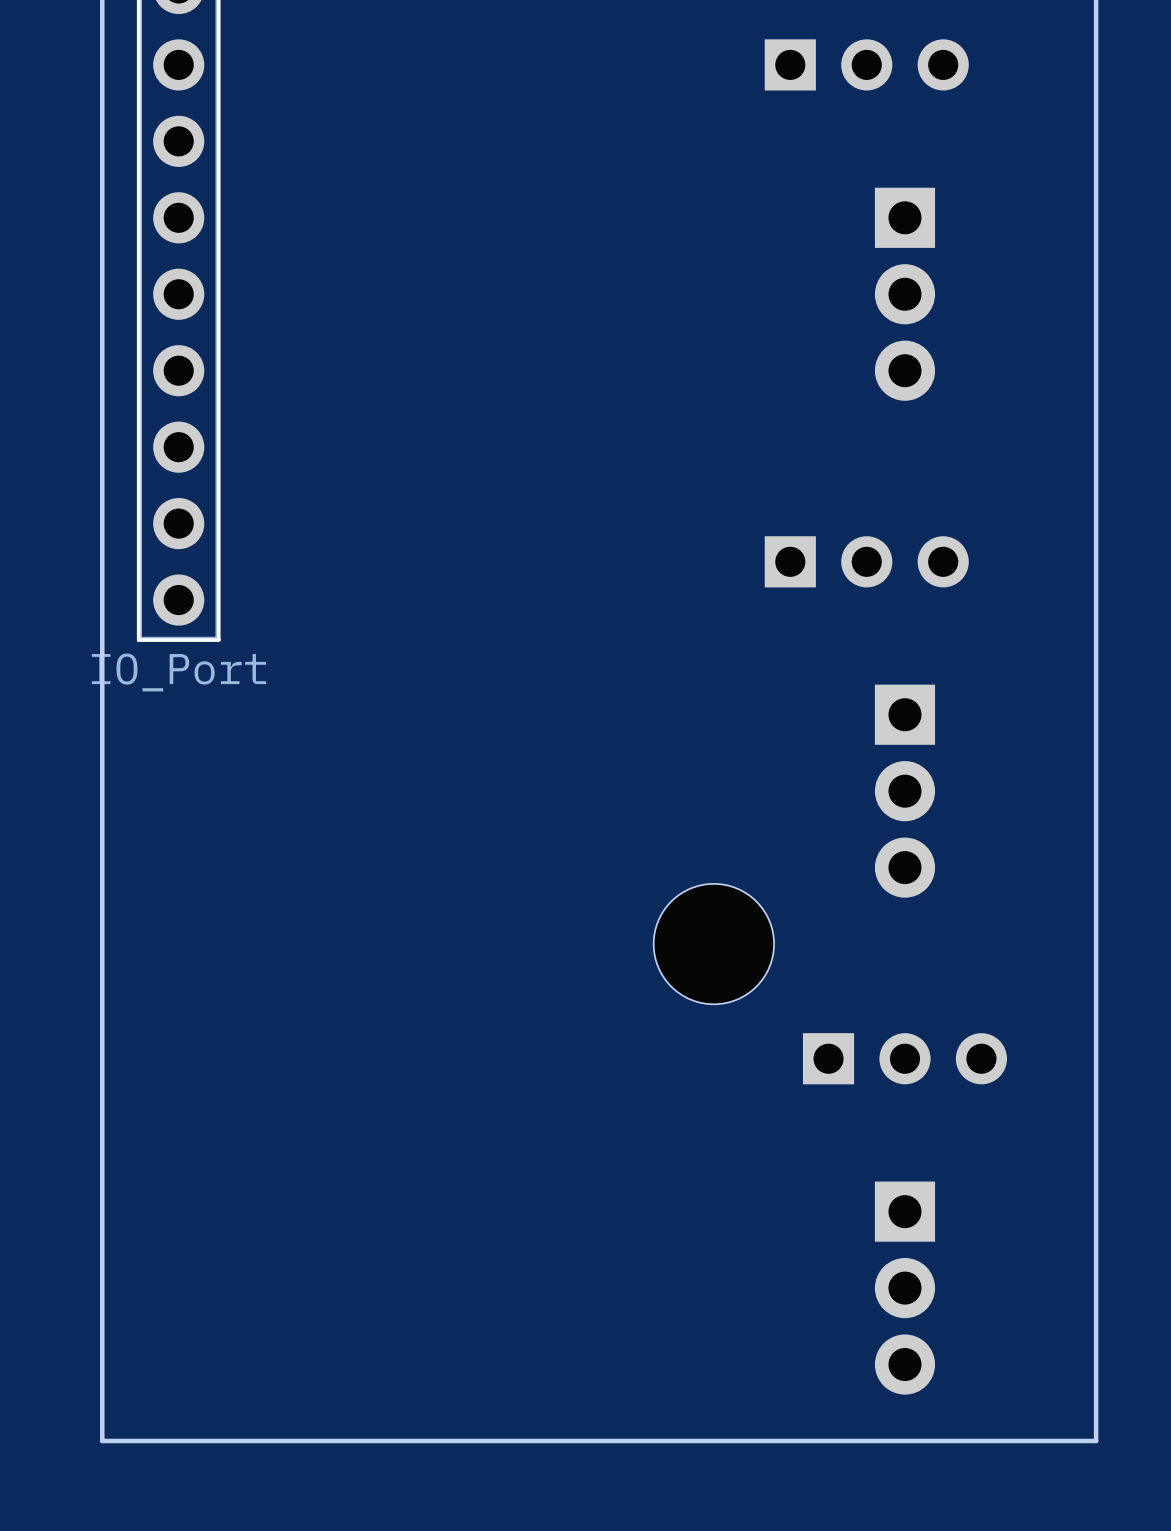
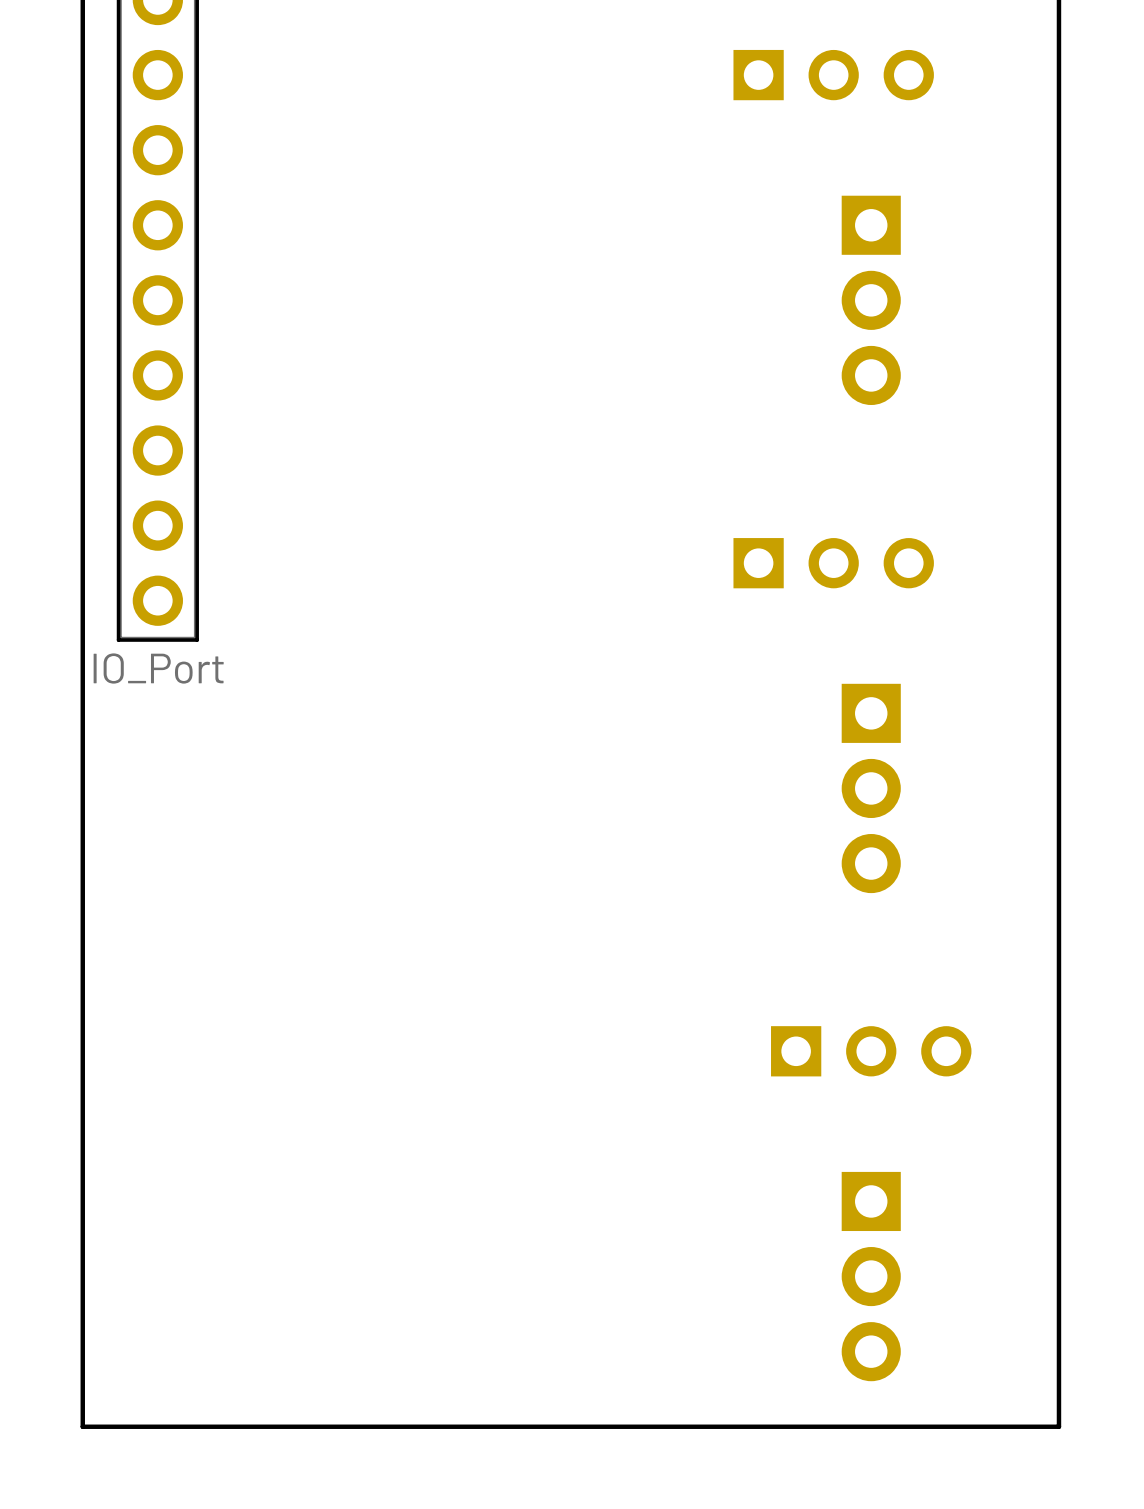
part: (713, 944) -> none

